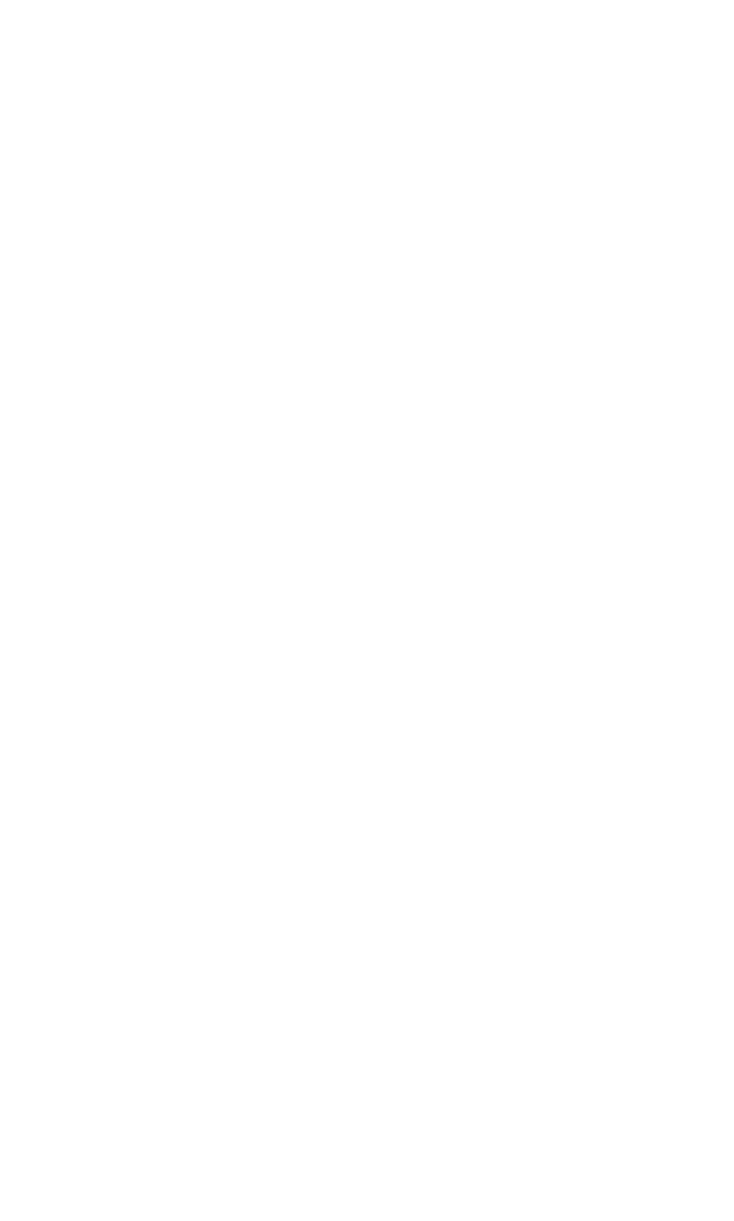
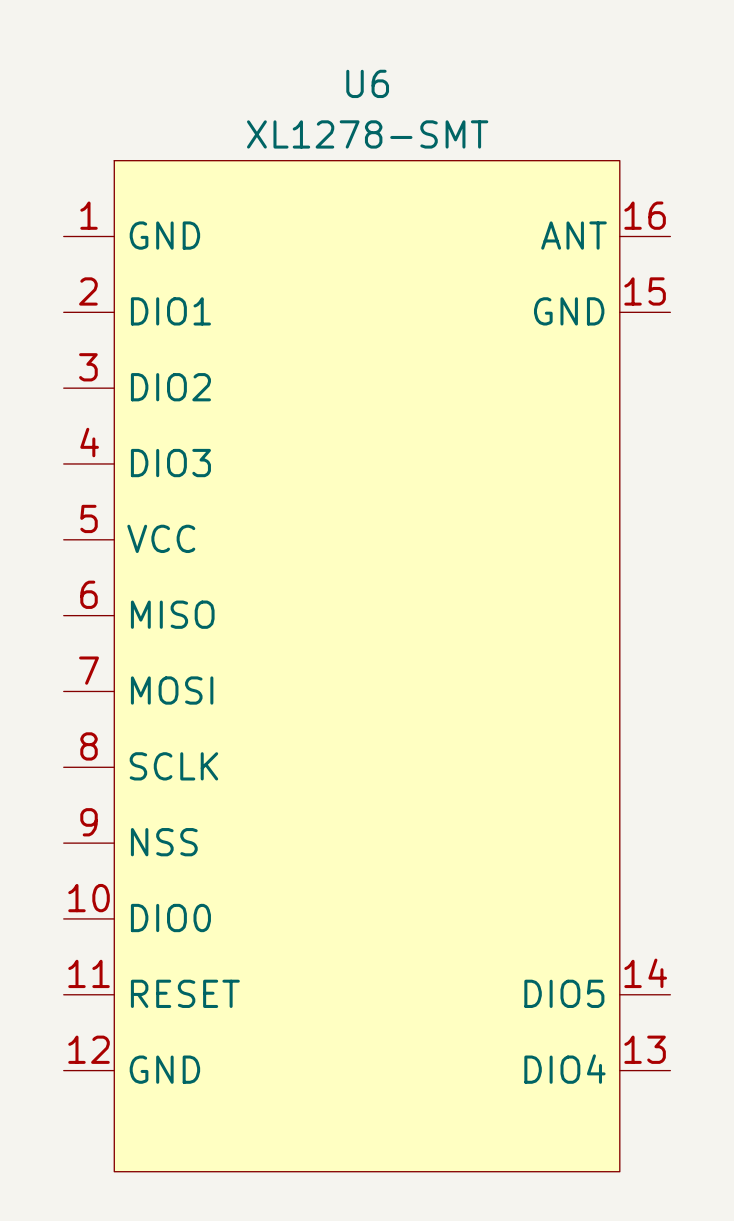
U6: none -> XL1278-SMT (367, 666)

